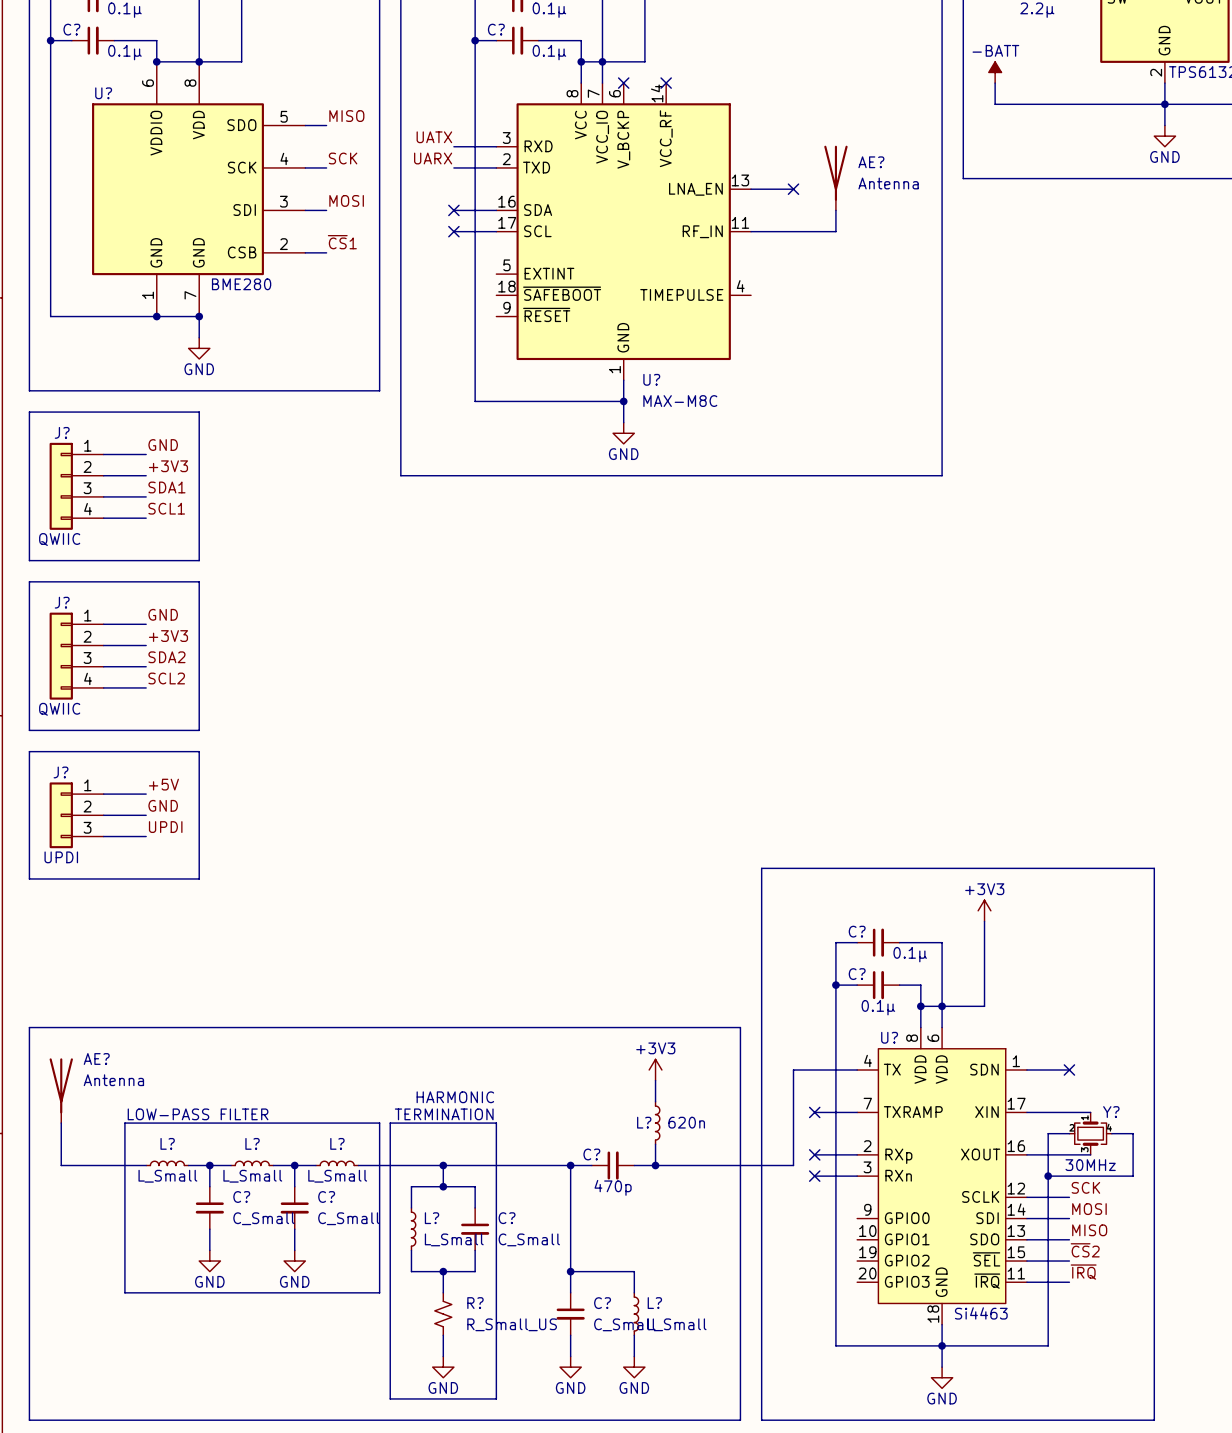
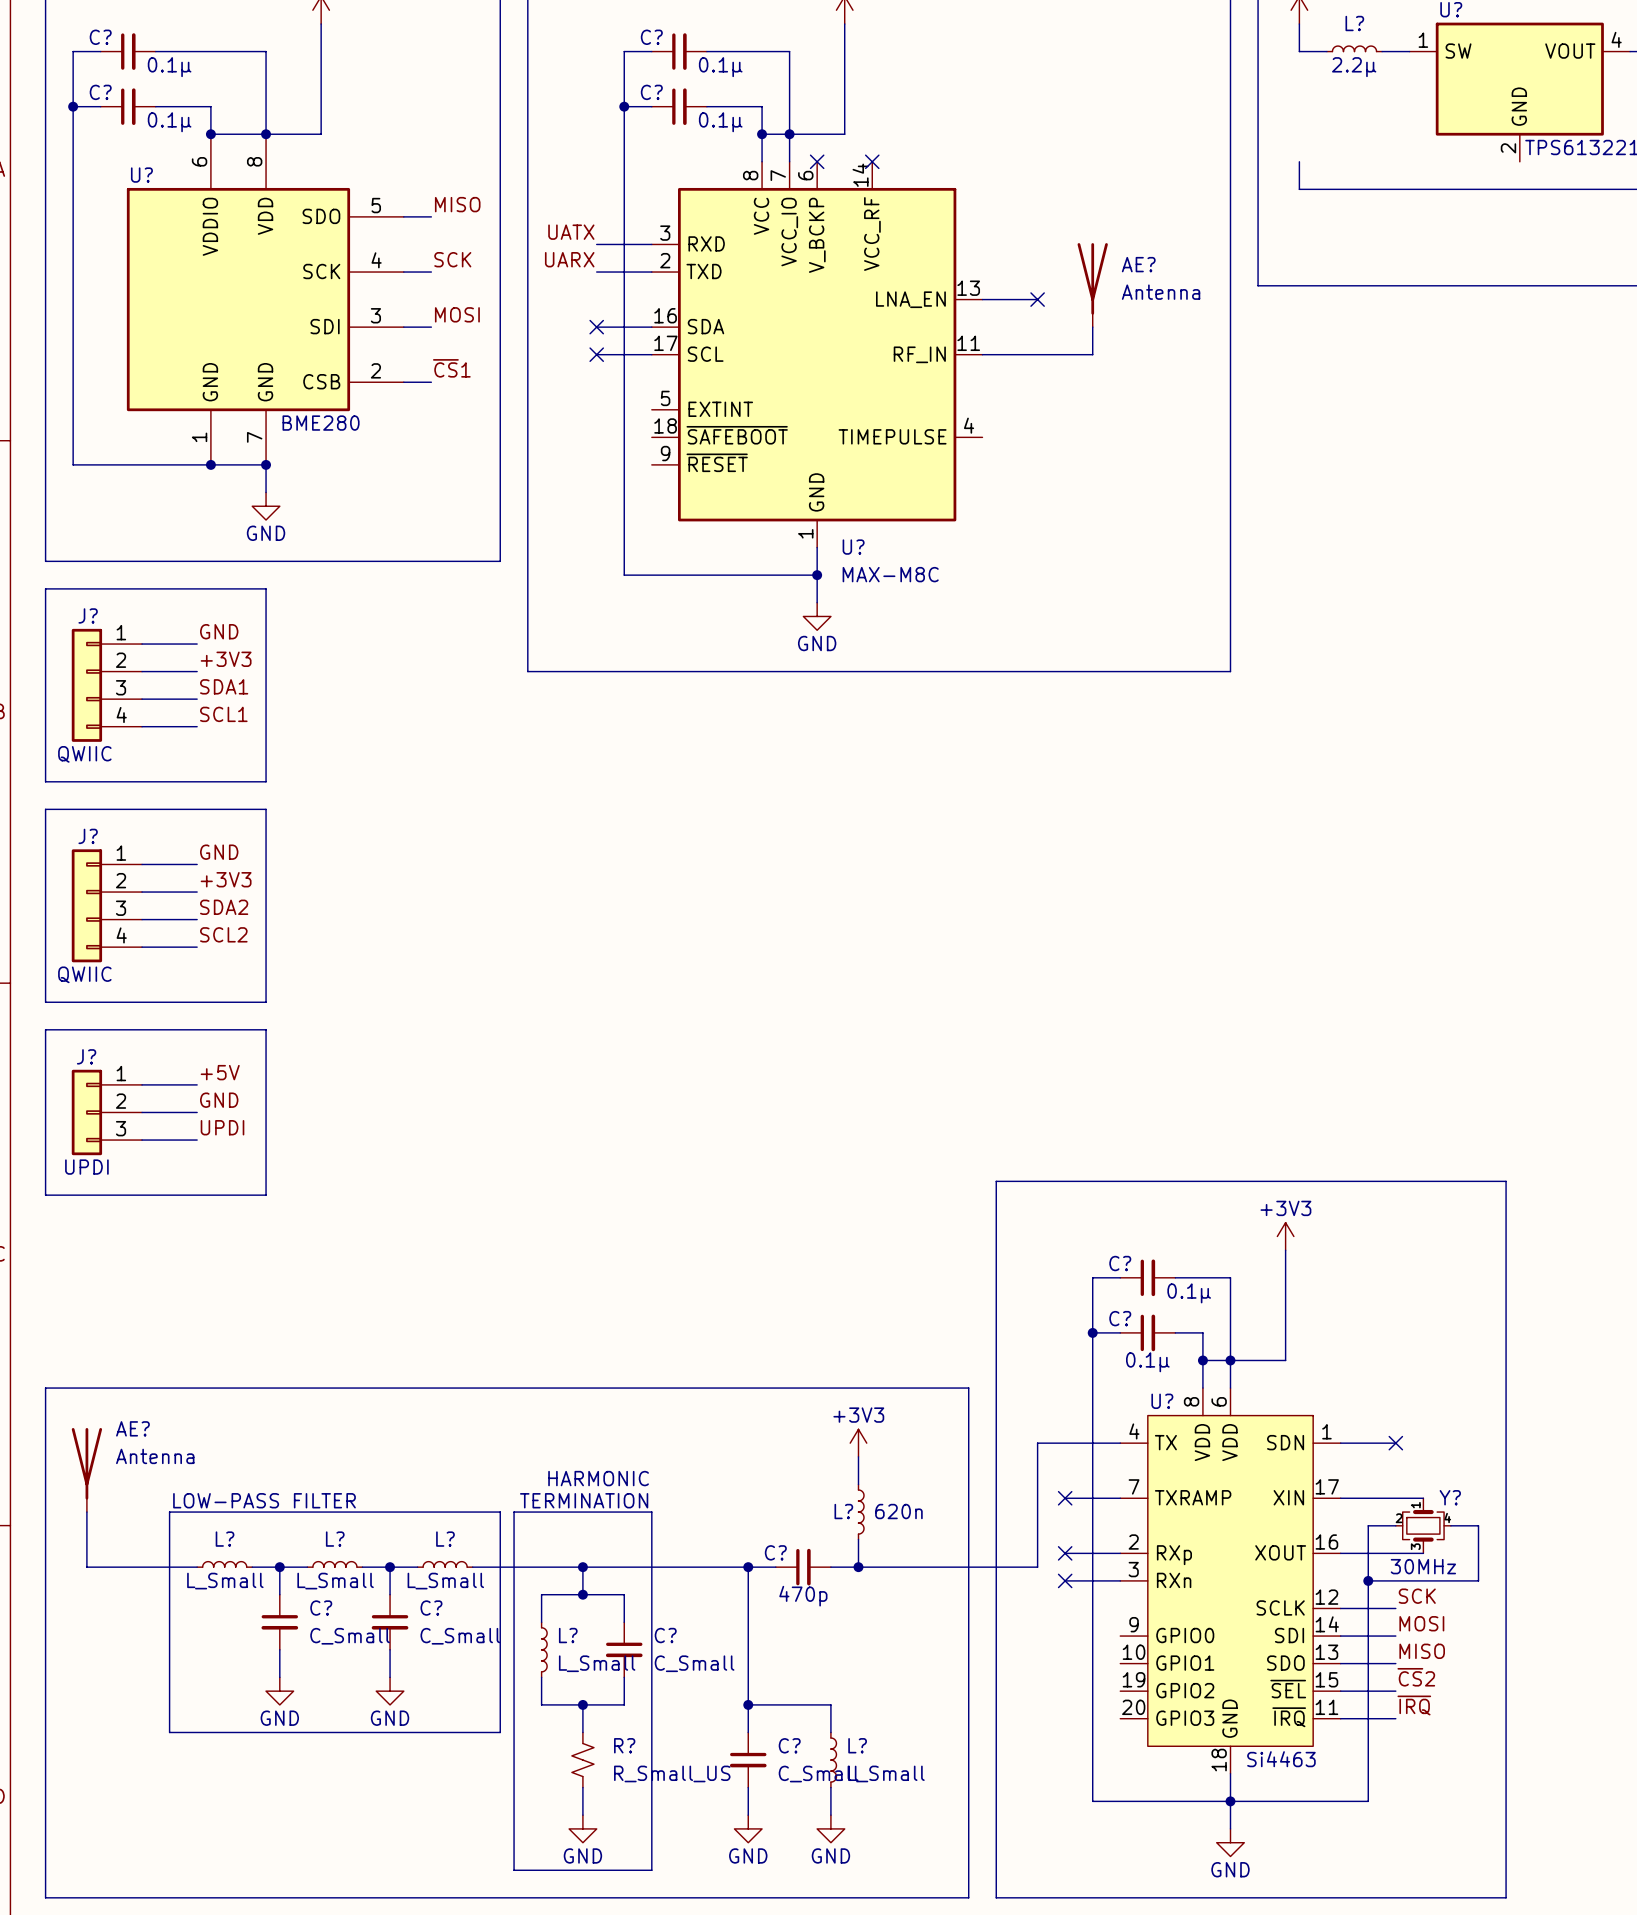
power symbol: -BATT (995, 72) -> none
wire: (1164, 83) (1164, 125) -> none
junction: (1164, 104) -> none
power symbol: GND (1164, 136) -> none

